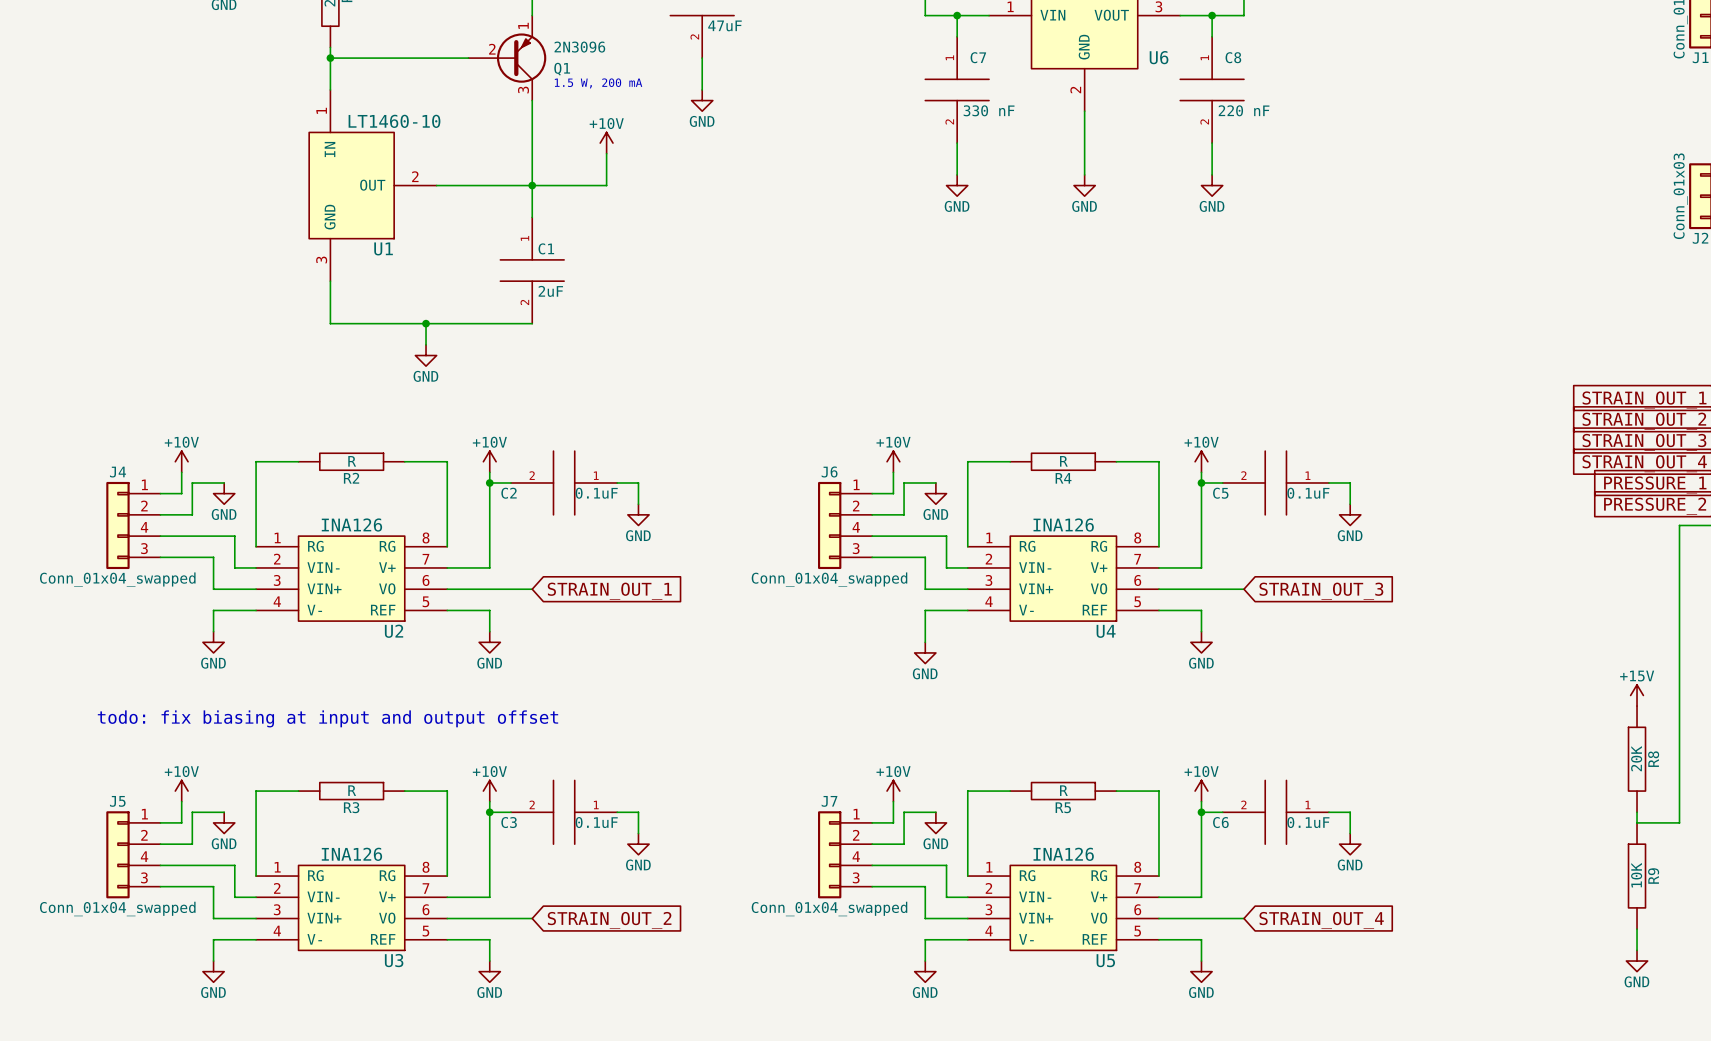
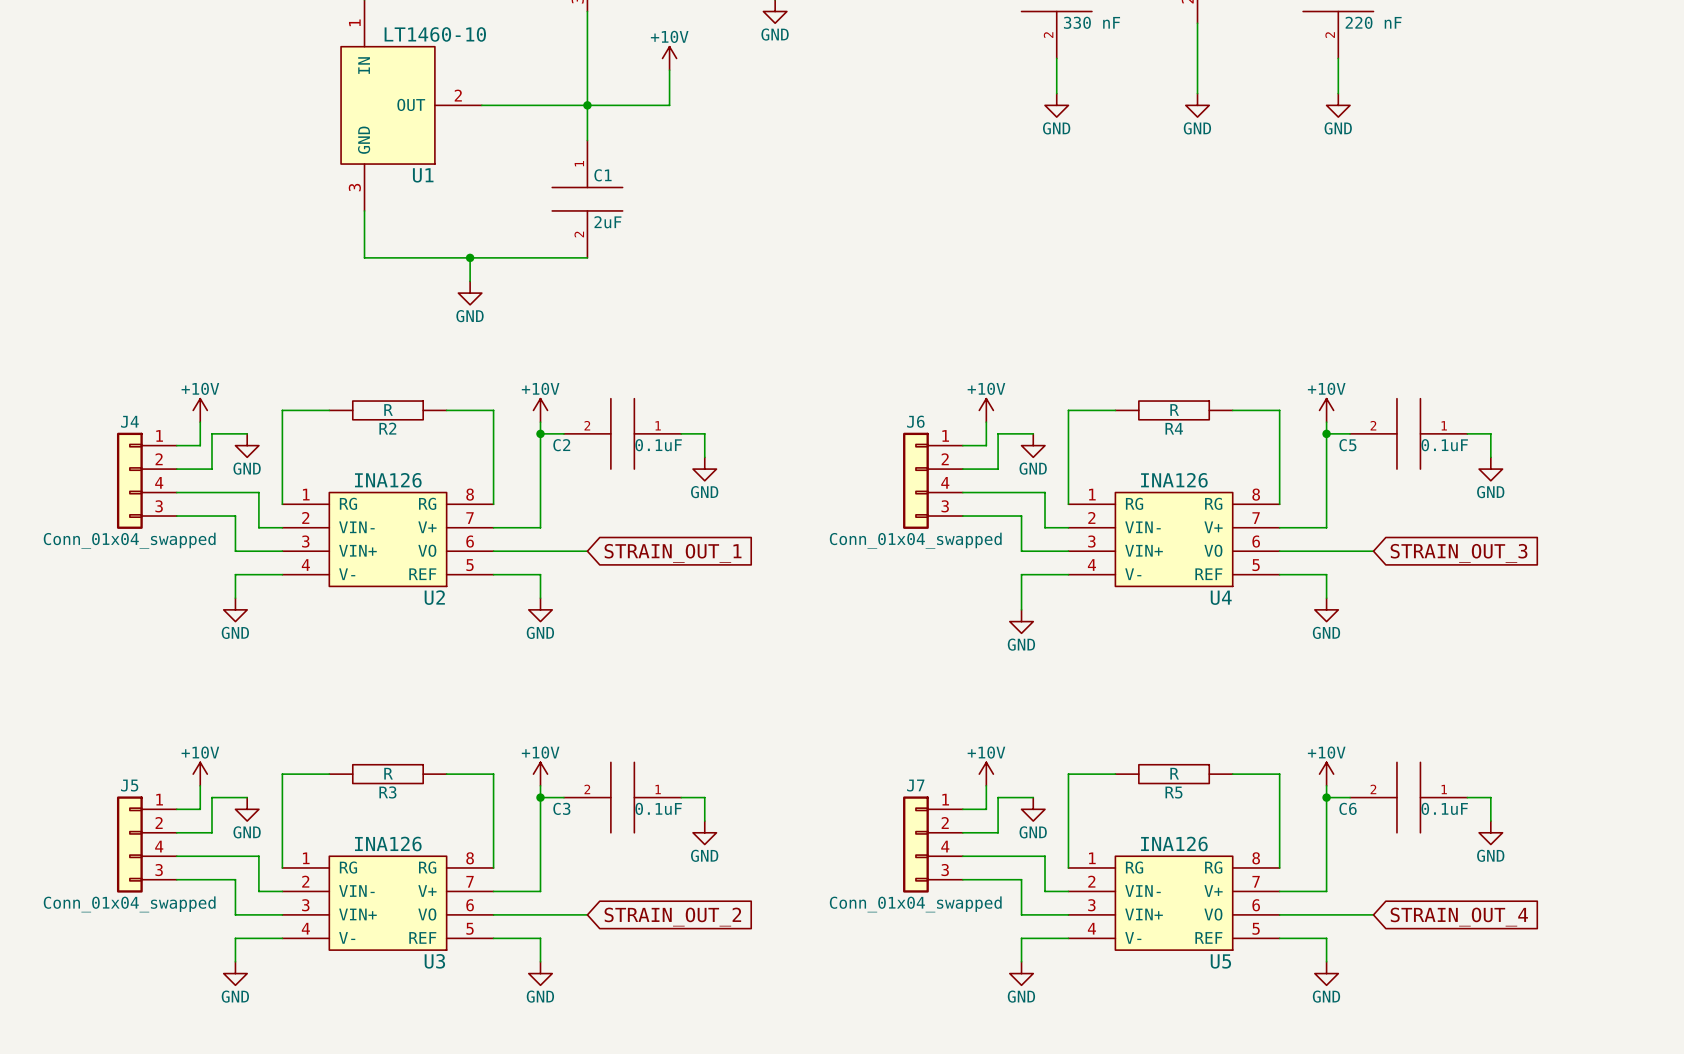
text: todo: fix biasing at input and output offset (327, 718) -> none

